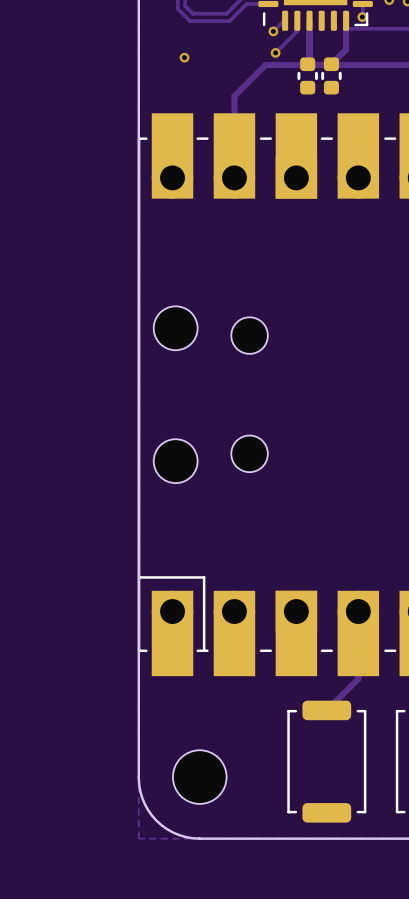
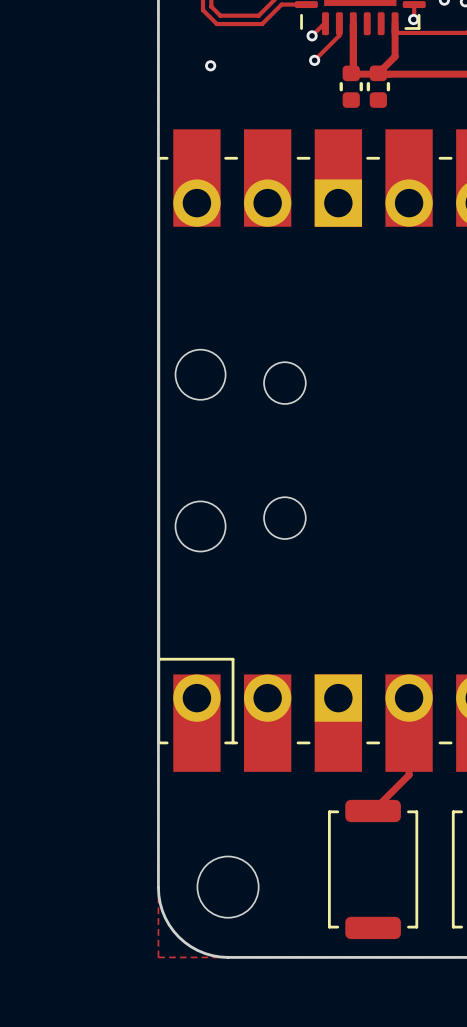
track: (307, 64) (265, 64) (234, 96) (234, 177) -> none

